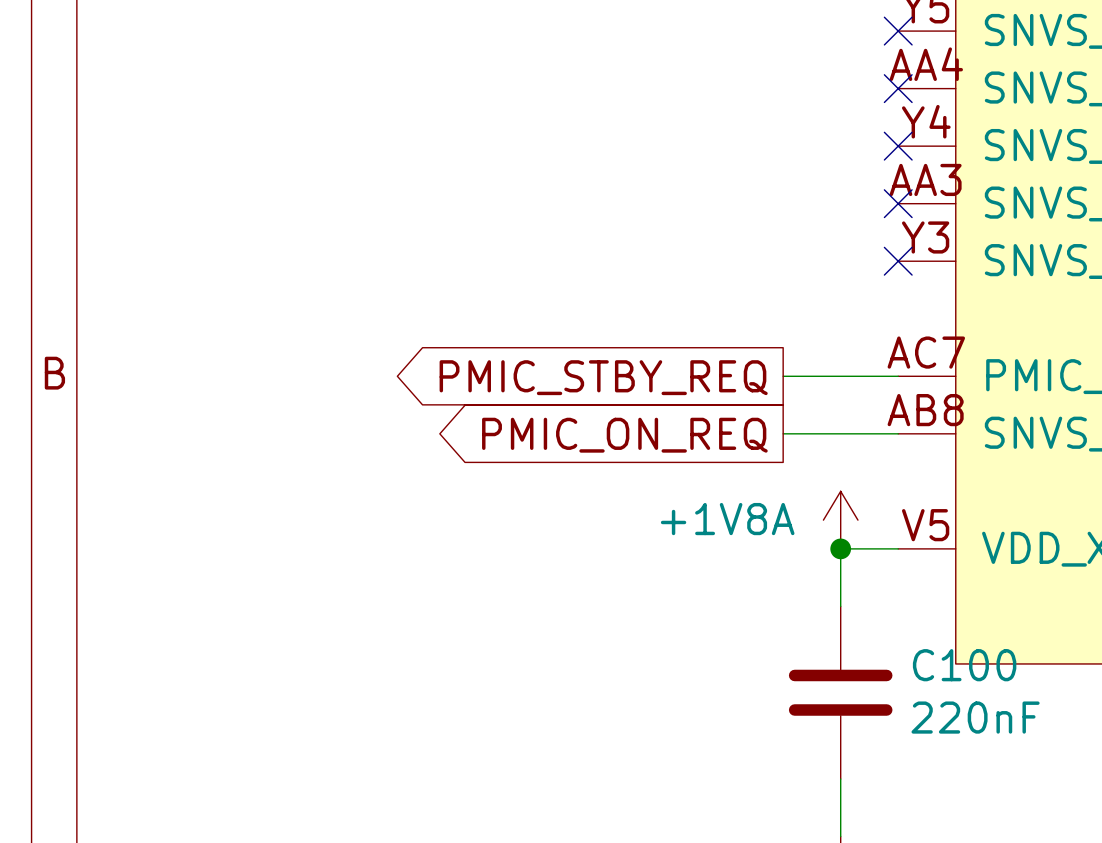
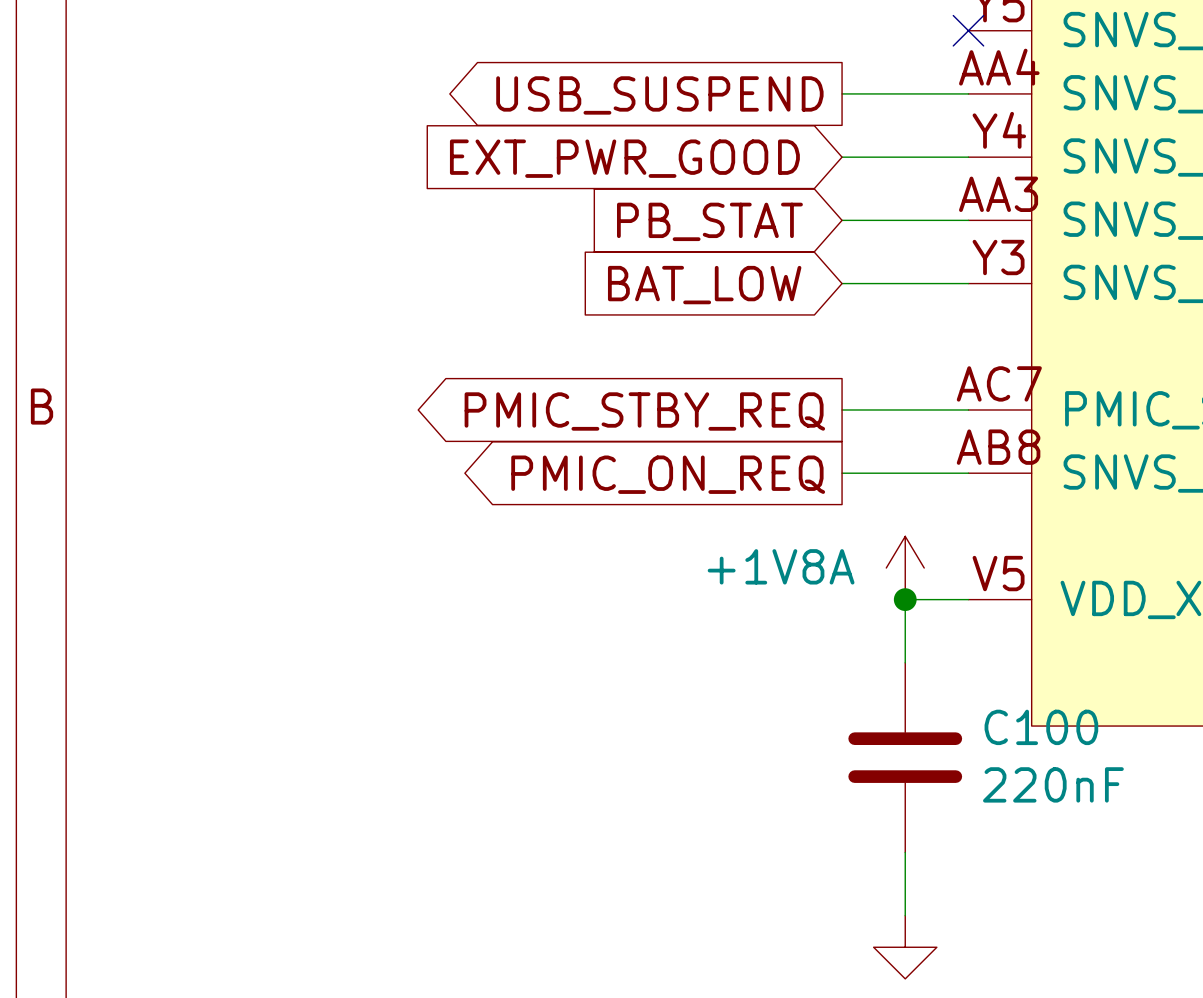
wire: none -> (842, 93) (968, 93)
no-connect mark: (898, 88) -> none
global label: none -> USB_SUSPEND (659, 95)
wire: none -> (842, 157) (968, 157)
no-connect mark: (898, 146) -> none
global label: none -> EXT_PWR_GOOD (624, 158)
wire: none -> (842, 220) (968, 220)
no-connect mark: (898, 203) -> none
global label: none -> PB_STAT (709, 221)
wire: none -> (842, 283) (968, 283)
no-connect mark: (898, 261) -> none
global label: none -> BAT_LOW (704, 285)

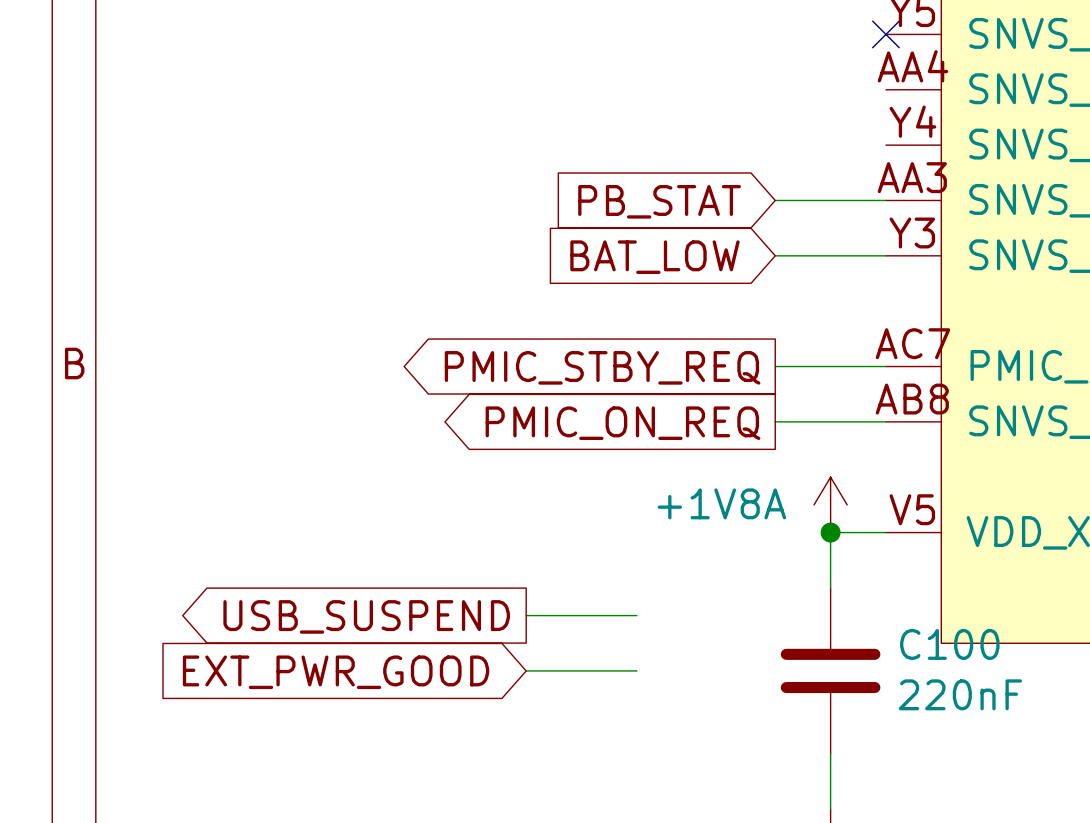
wire: (842, 93) (968, 93) -> none
global label: USB_SUSPEND (659, 95) -> none
wire: (842, 157) (968, 157) -> (526, 615) (636, 615)
global label: EXT_PWR_GOOD (624, 158) -> none
global label: none -> USB_SUSPEND (366, 616)
wire: none -> (526, 670) (636, 670)
global label: none -> EXT_PWR_GOOD (336, 672)

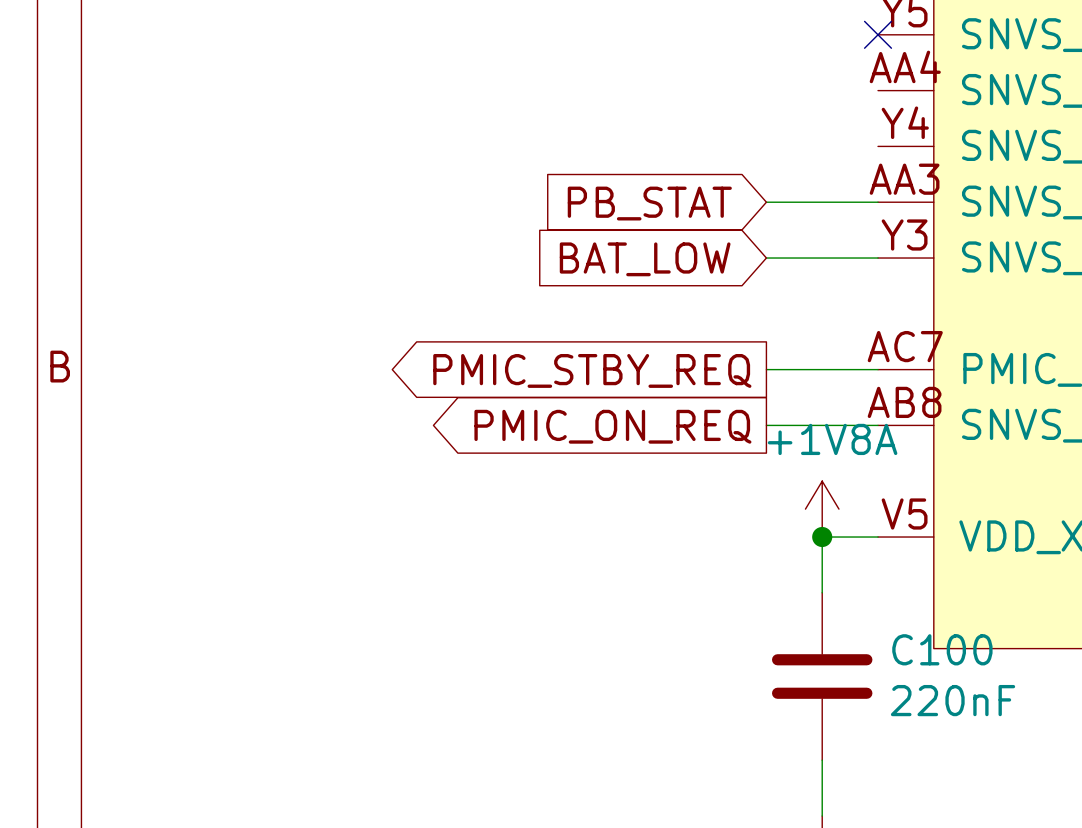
power symbol text position: +1V8A (721, 503) -> +1V8A (832, 439)
wire: (526, 615) (636, 615) -> none
global label: USB_SUSPEND (366, 616) -> none
wire: (526, 670) (636, 670) -> none
global label: EXT_PWR_GOOD (336, 672) -> none

